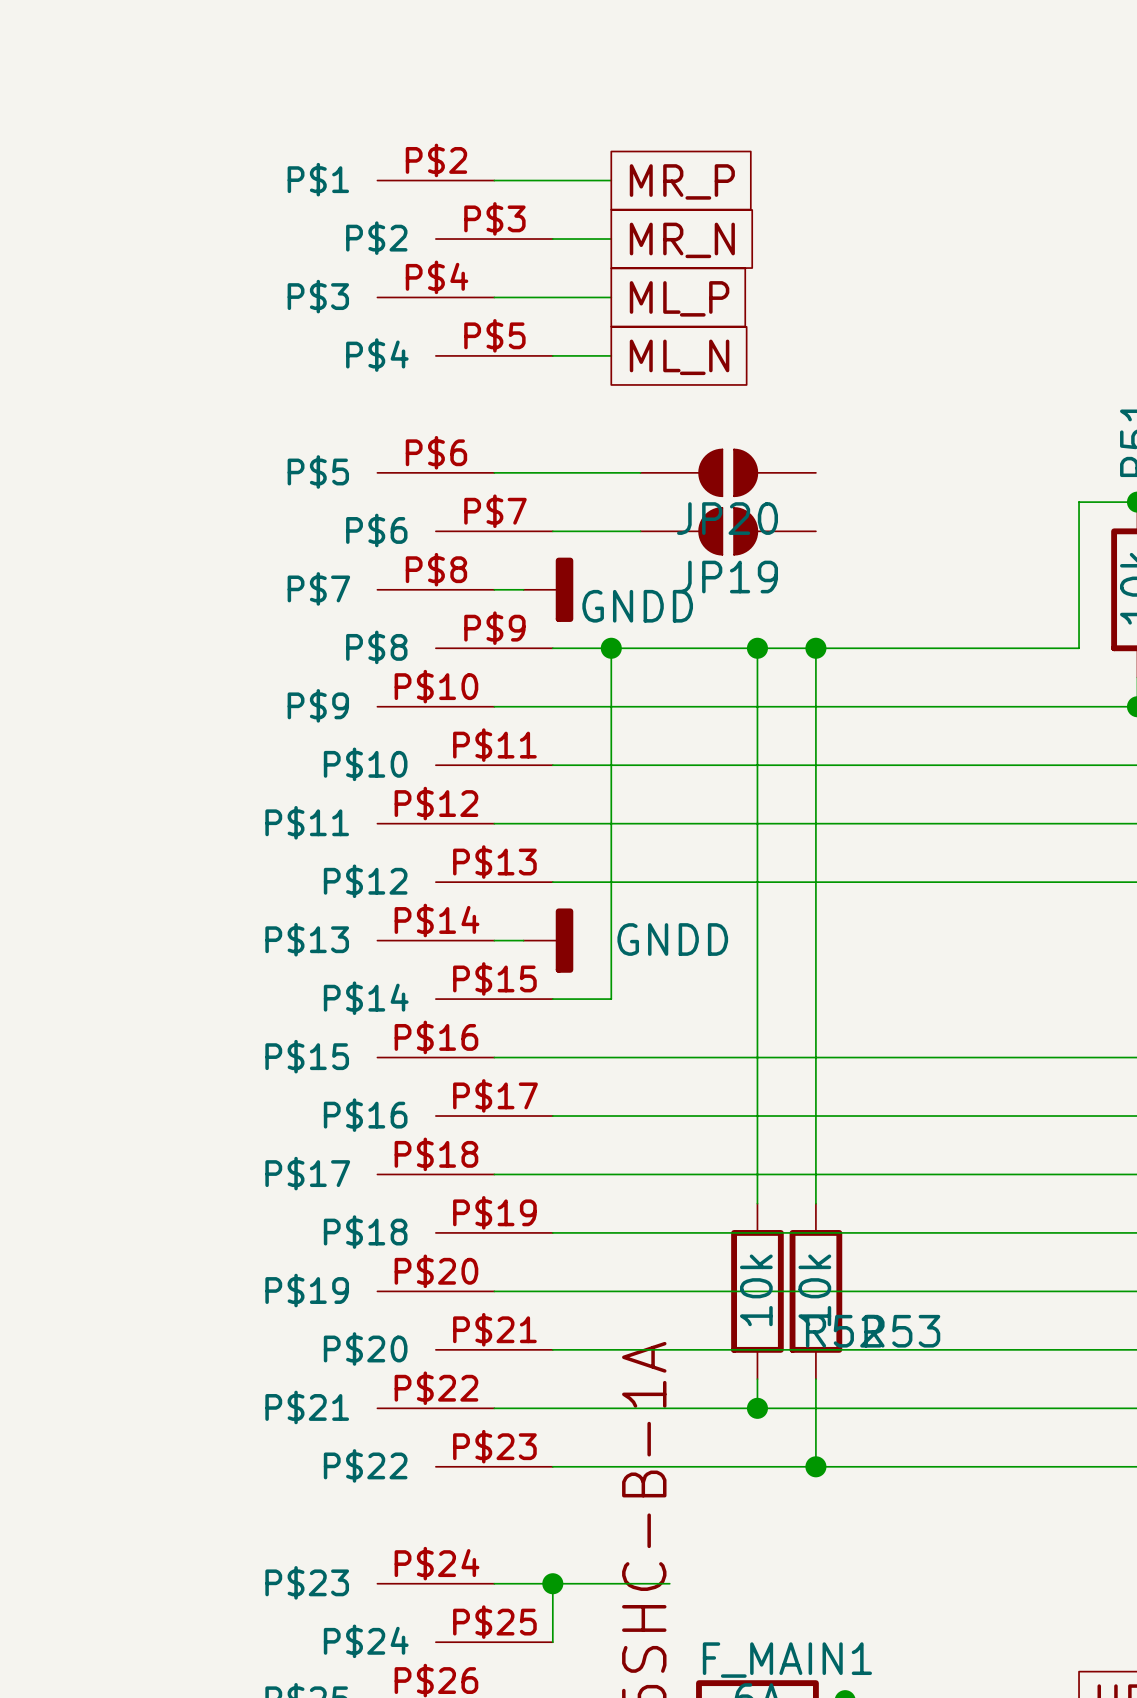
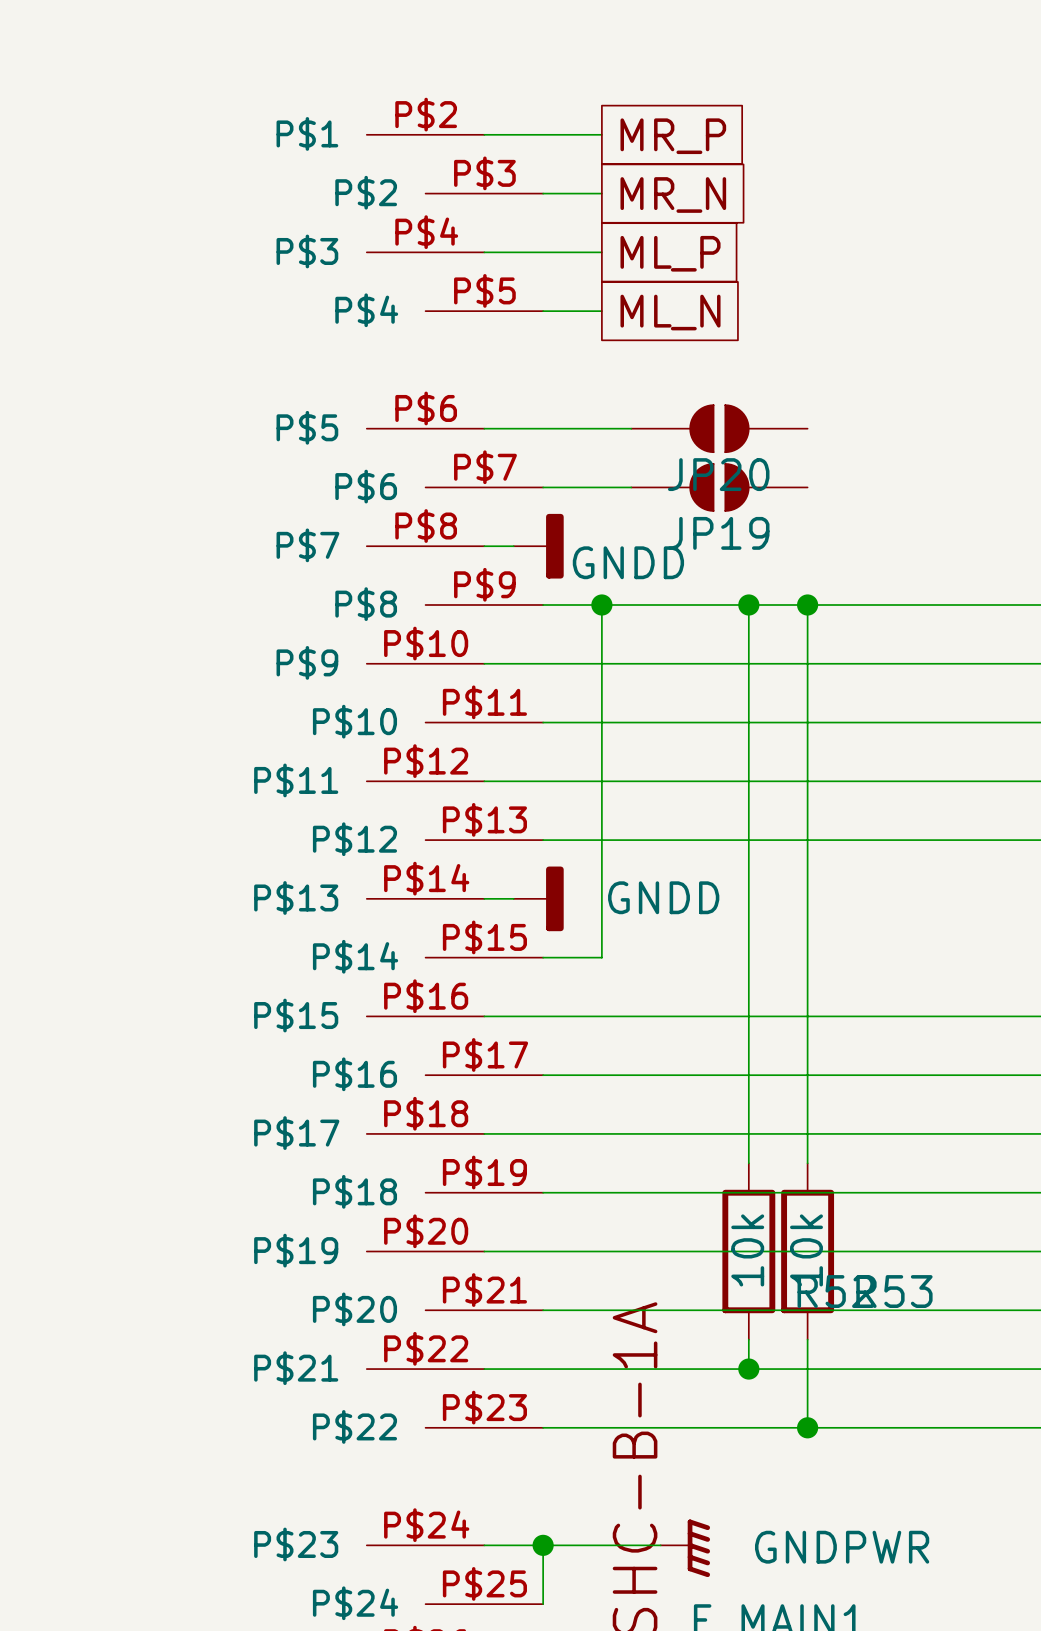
power symbol: none -> GNDPWR (685, 1548)

